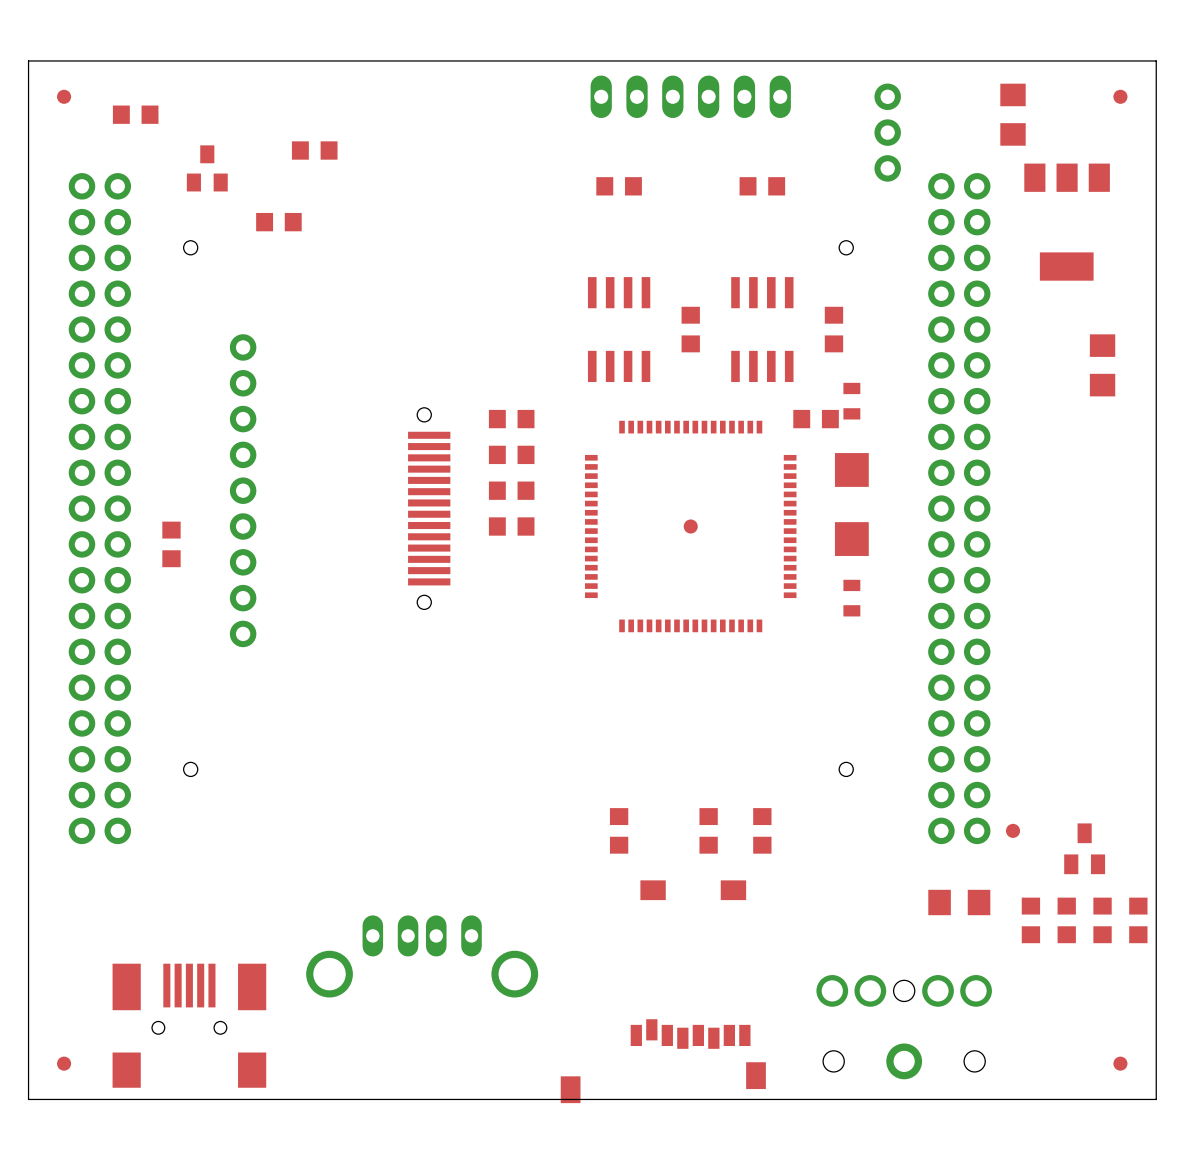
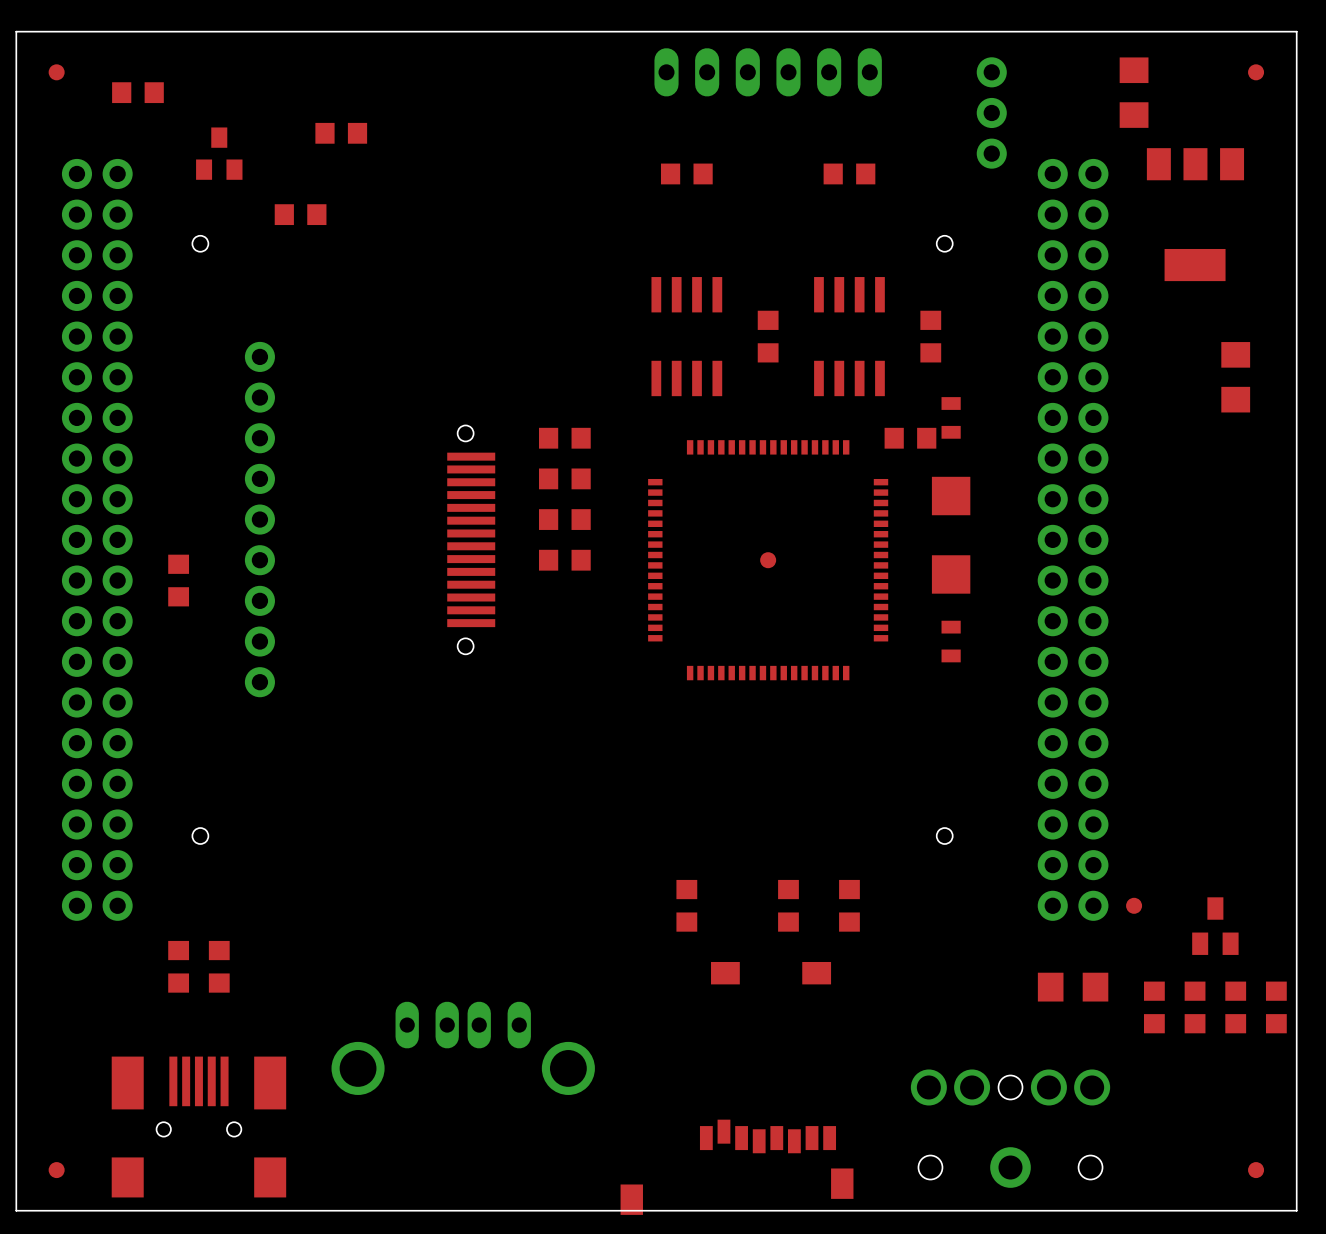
part: none -> (178, 966)
part: none -> (219, 966)

